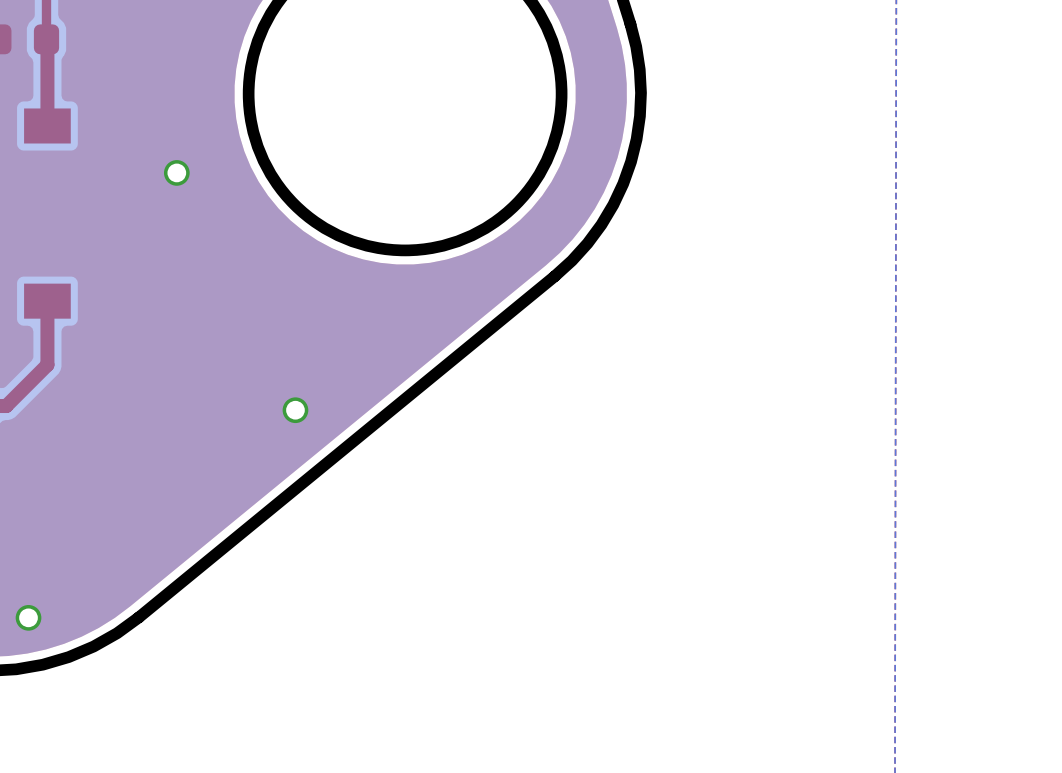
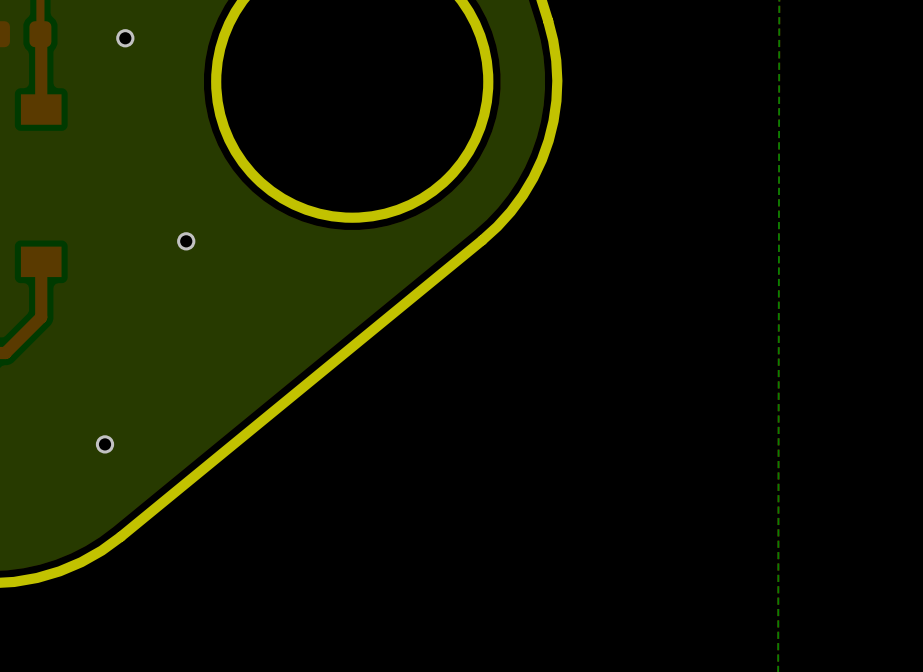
via: none -> (125, 38)
via: (176, 172) -> none
via: none -> (186, 241)
via: (295, 410) -> none
via: none -> (105, 444)
via: (28, 617) -> none

